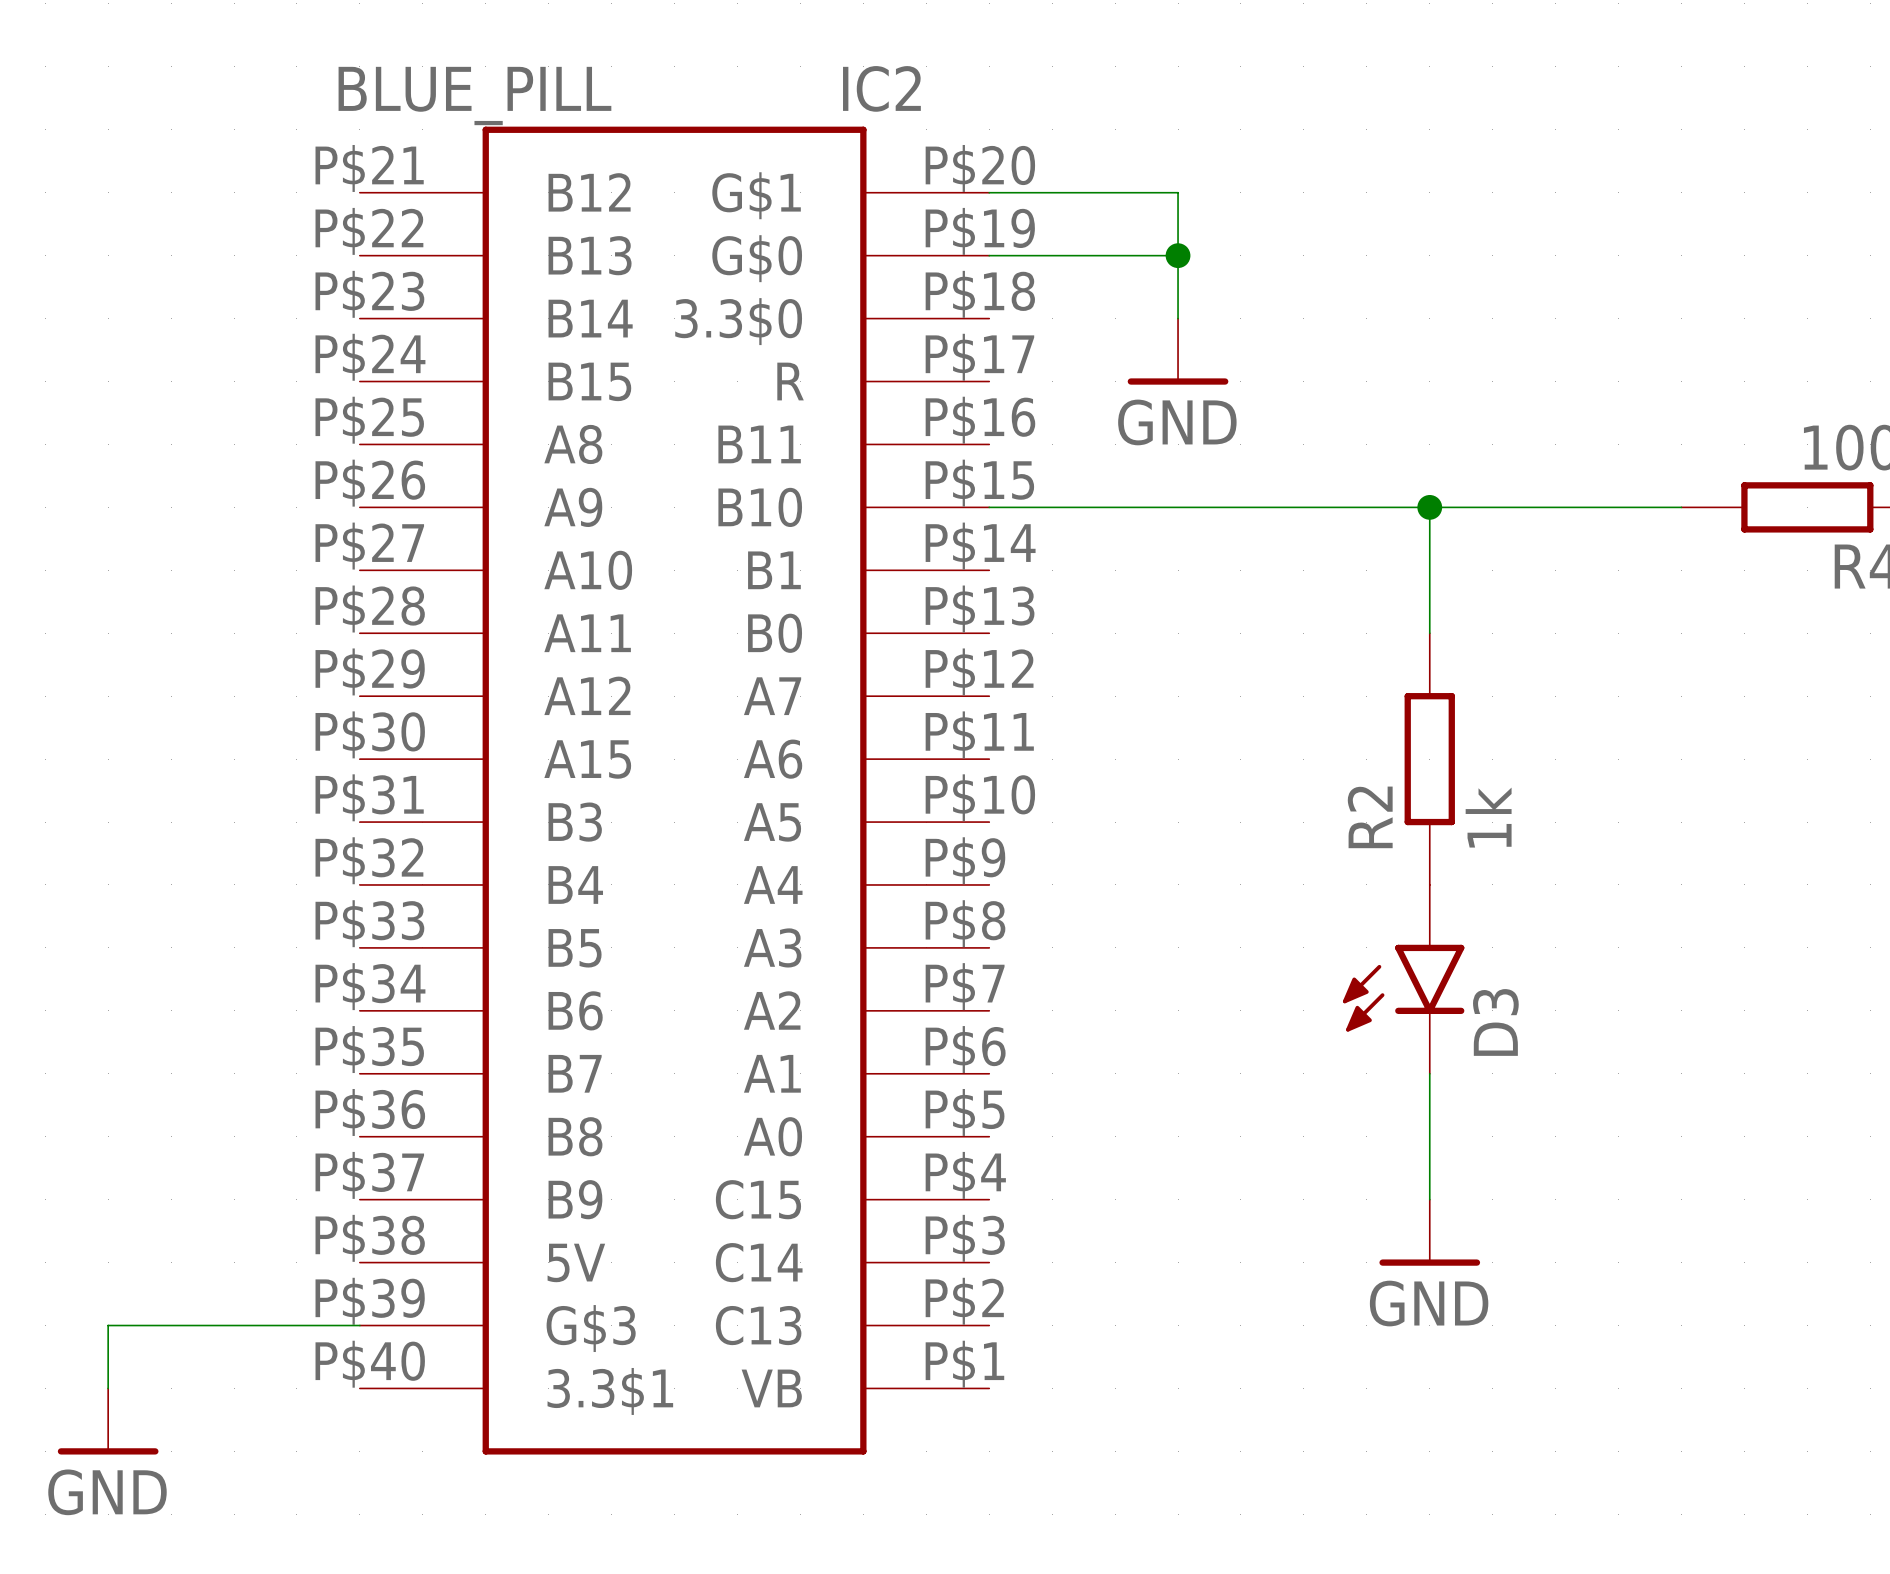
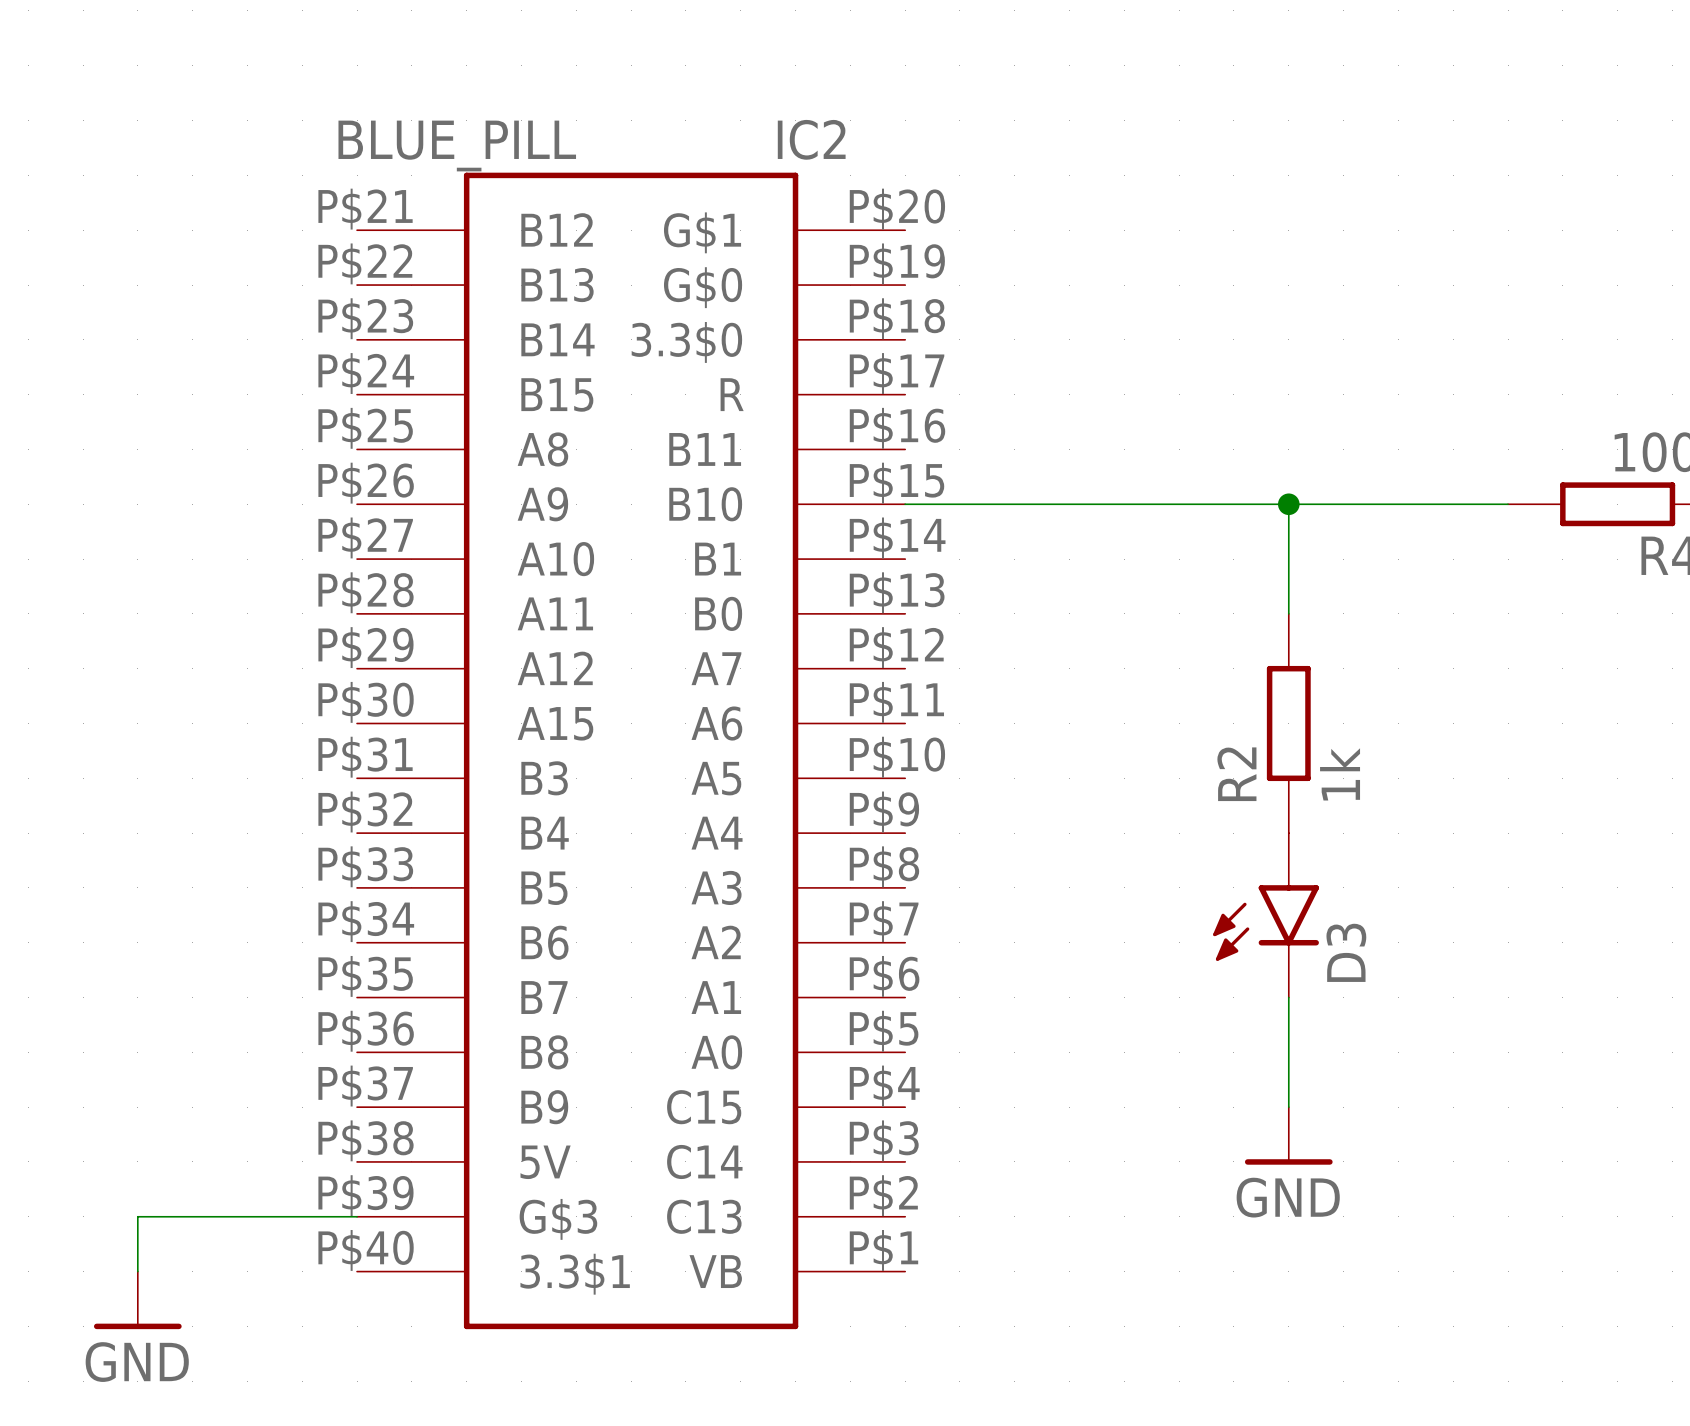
wire: (989, 192) (1178, 192) (1178, 318) -> none
wire: (989, 255) (1178, 255) -> none
junction: (1178, 255) -> none
power symbol: GND (1178, 351) -> none

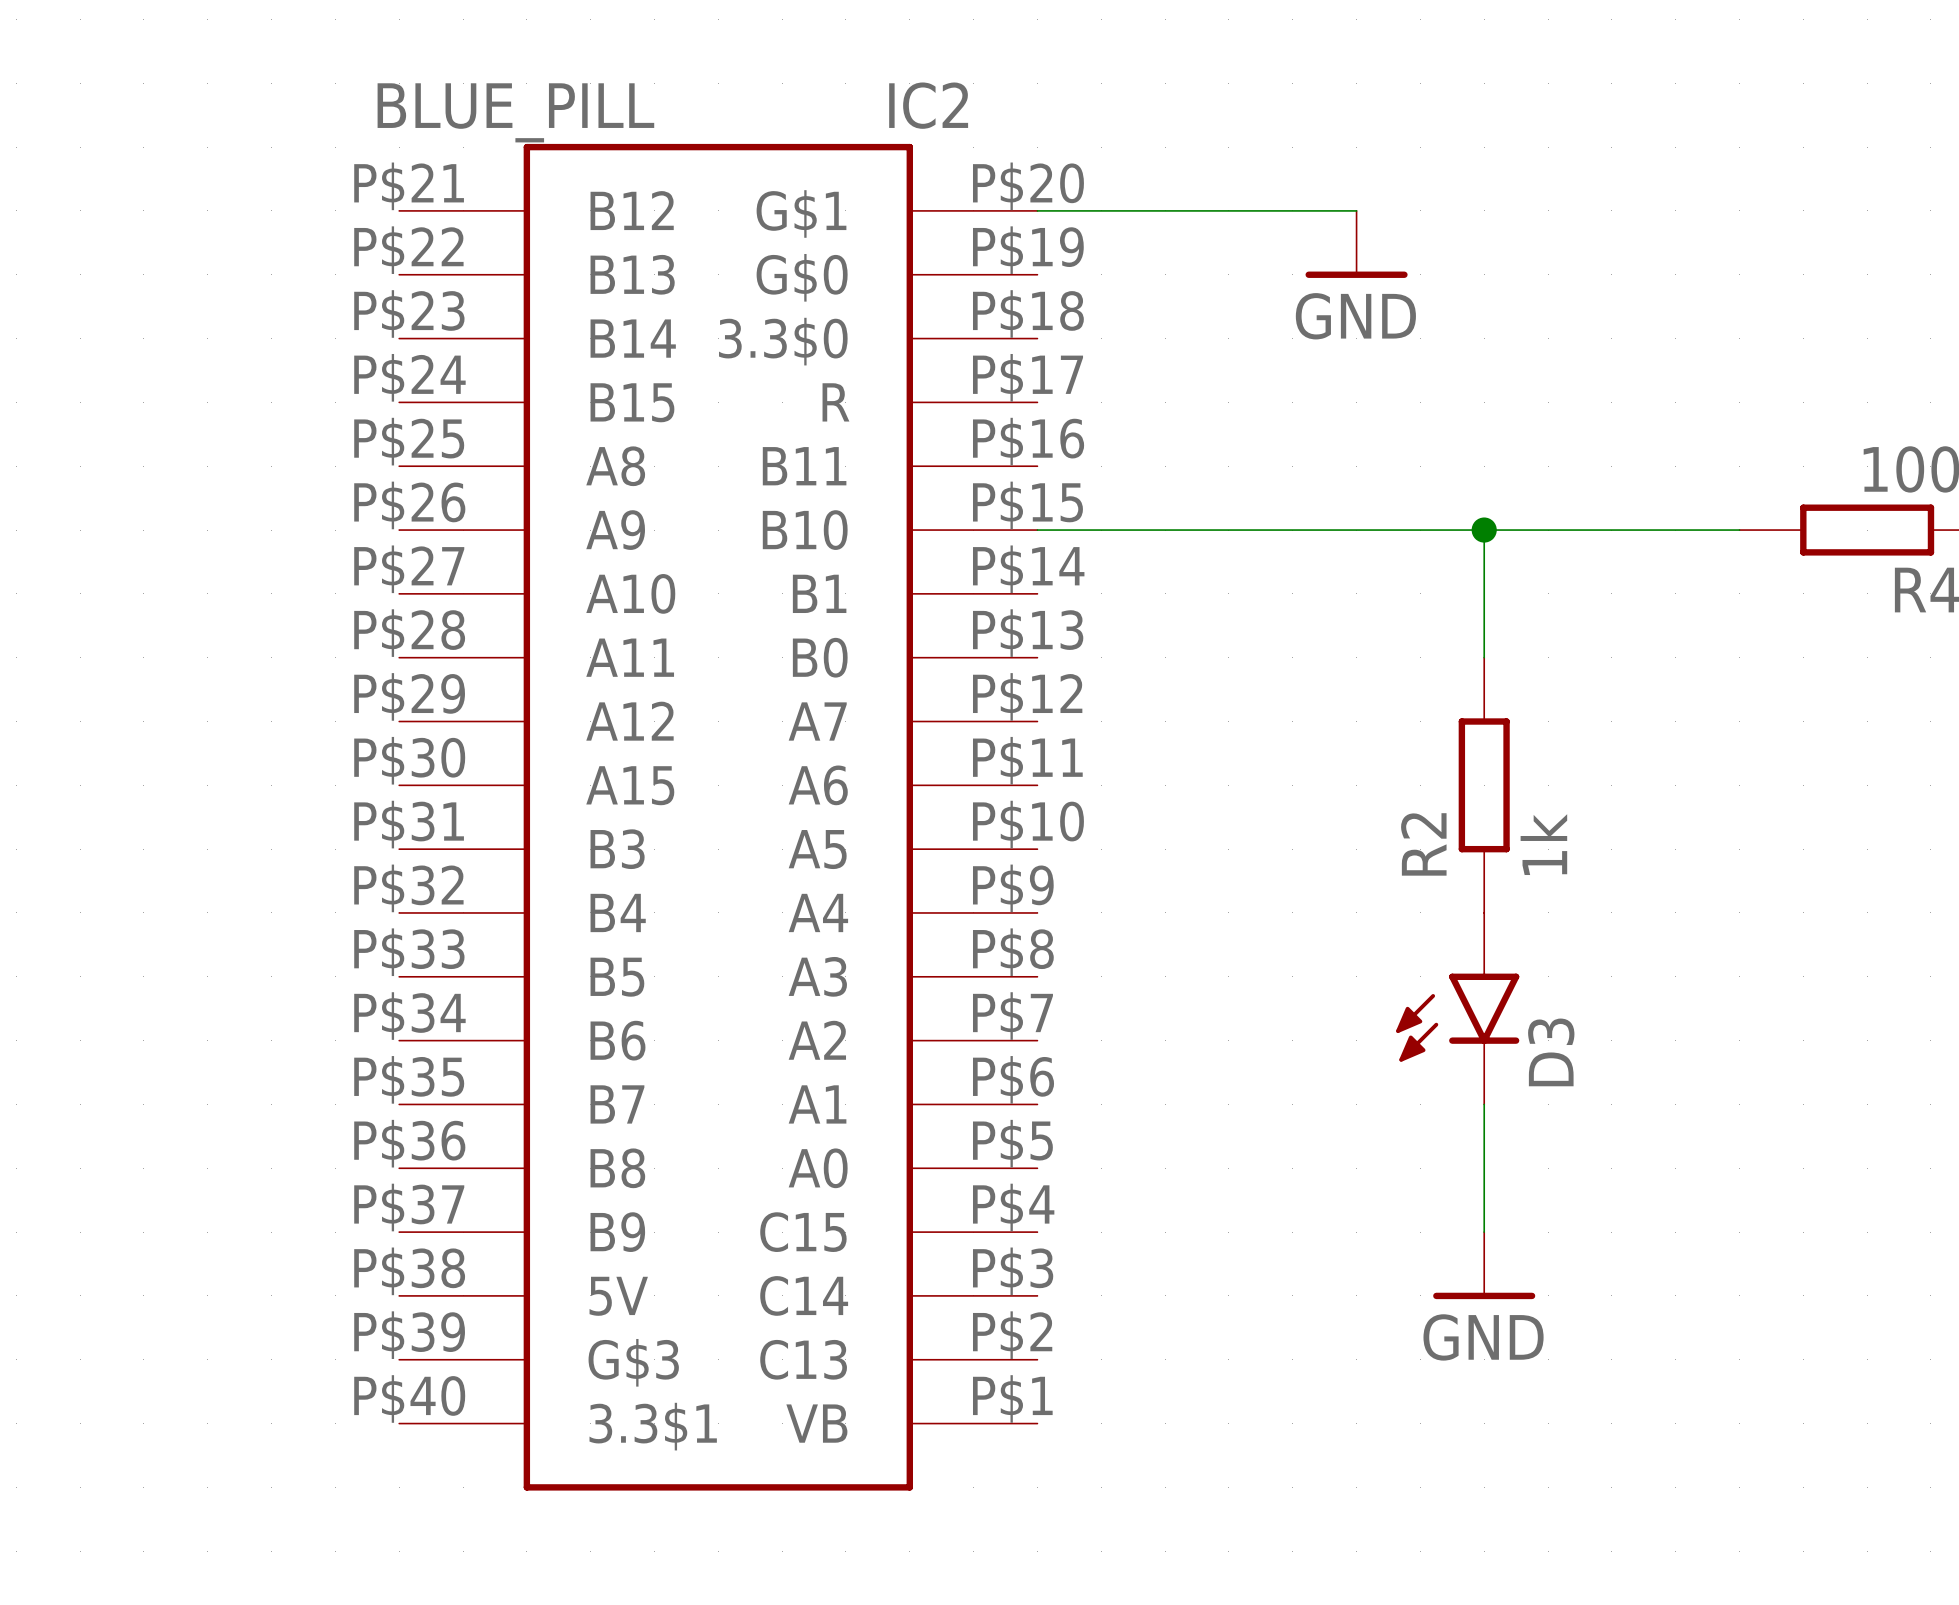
wire: none -> (1037, 210) (1356, 210)
power symbol: none -> GND (1356, 244)
wire: (357, 1216) (137, 1216) (137, 1271) -> none
power symbol: GND (137, 1300) -> none

